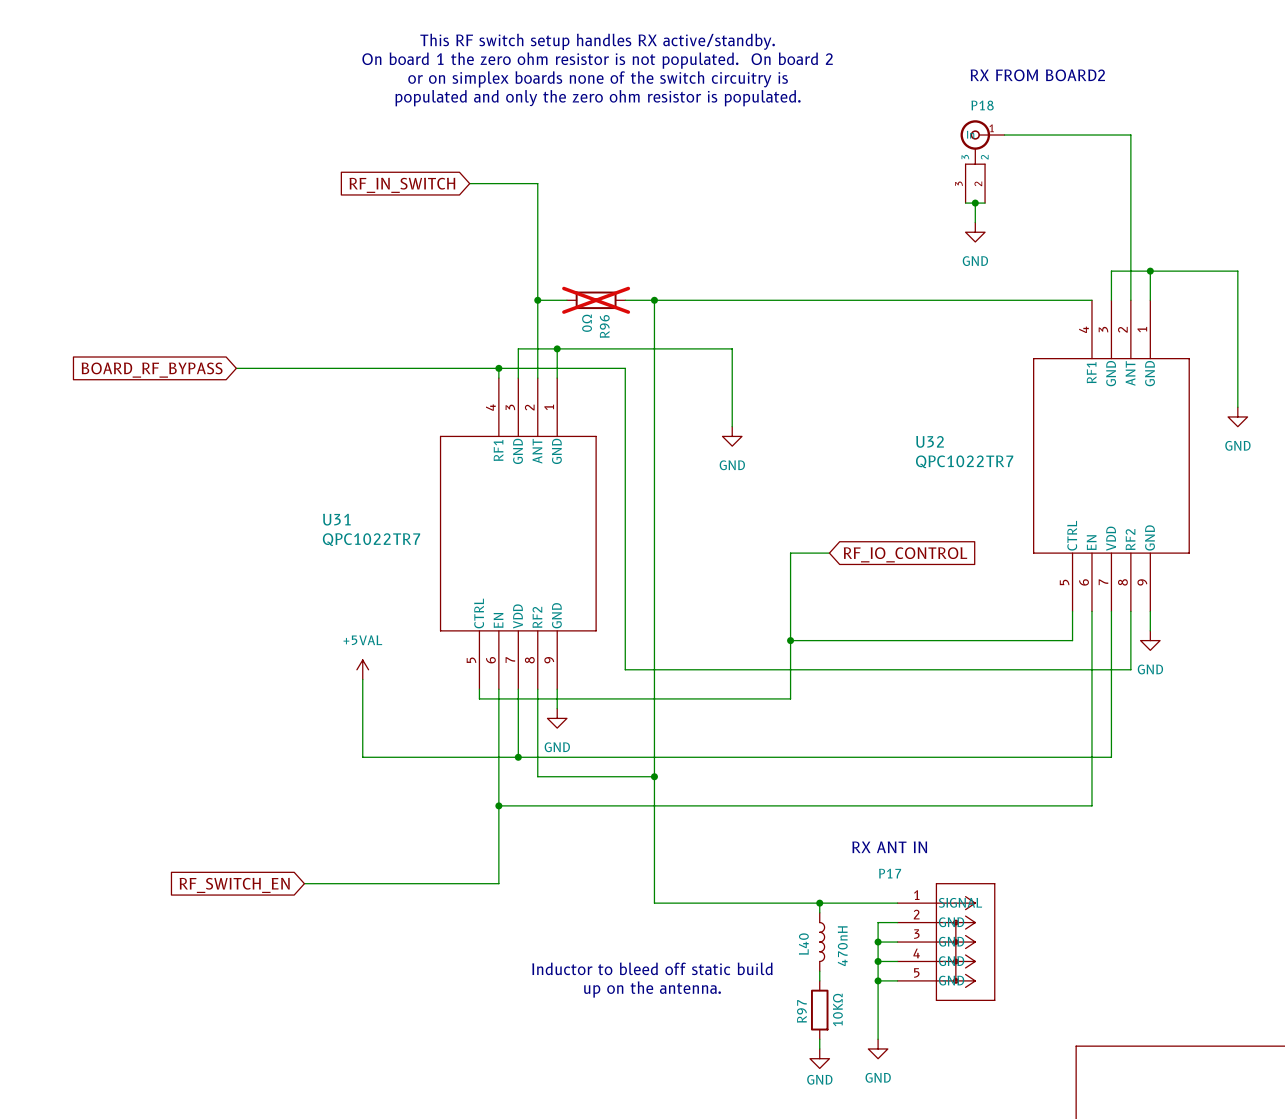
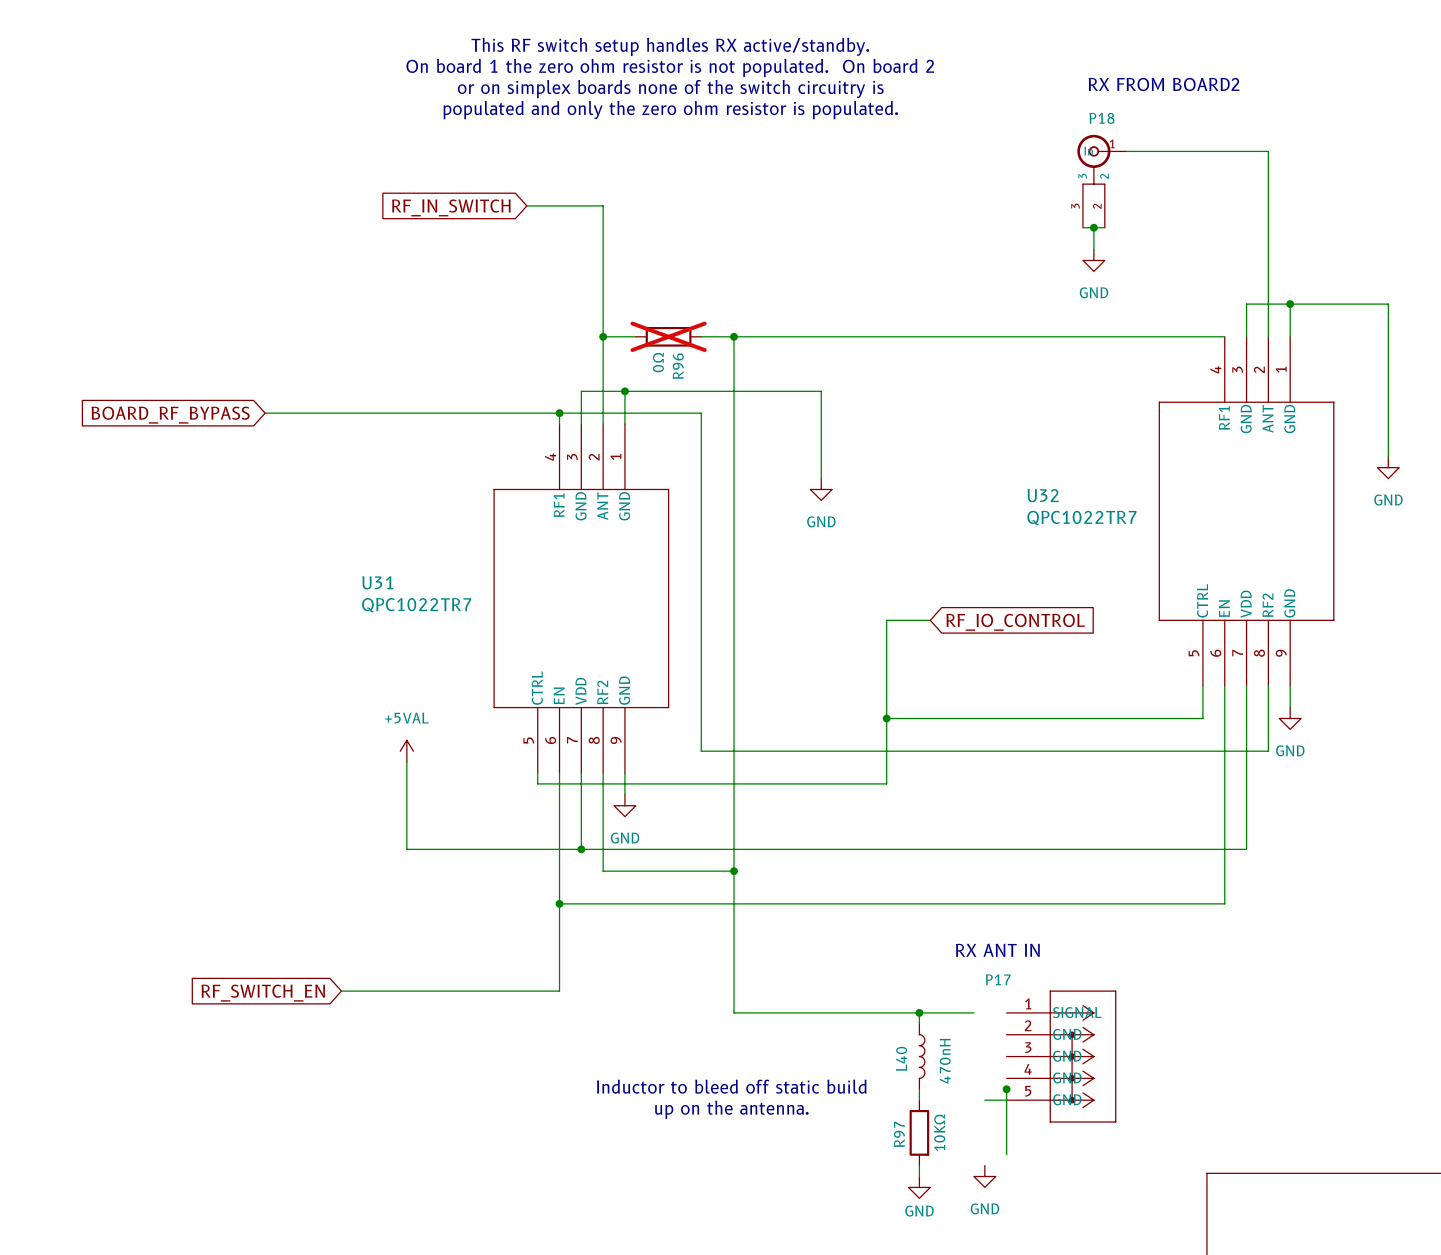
wire: (868, 903) (897, 903) -> none
wire: (897, 922) (878, 922) (878, 1039) -> none
wire: (878, 942) (897, 942) -> none
junction: (878, 942) -> none
wire: (878, 961) (897, 961) -> none
junction: (878, 961) -> none
wire: none -> (1006, 1089) (1006, 1154)
junction: none -> (1006, 1089)
junction: (878, 980) -> none

